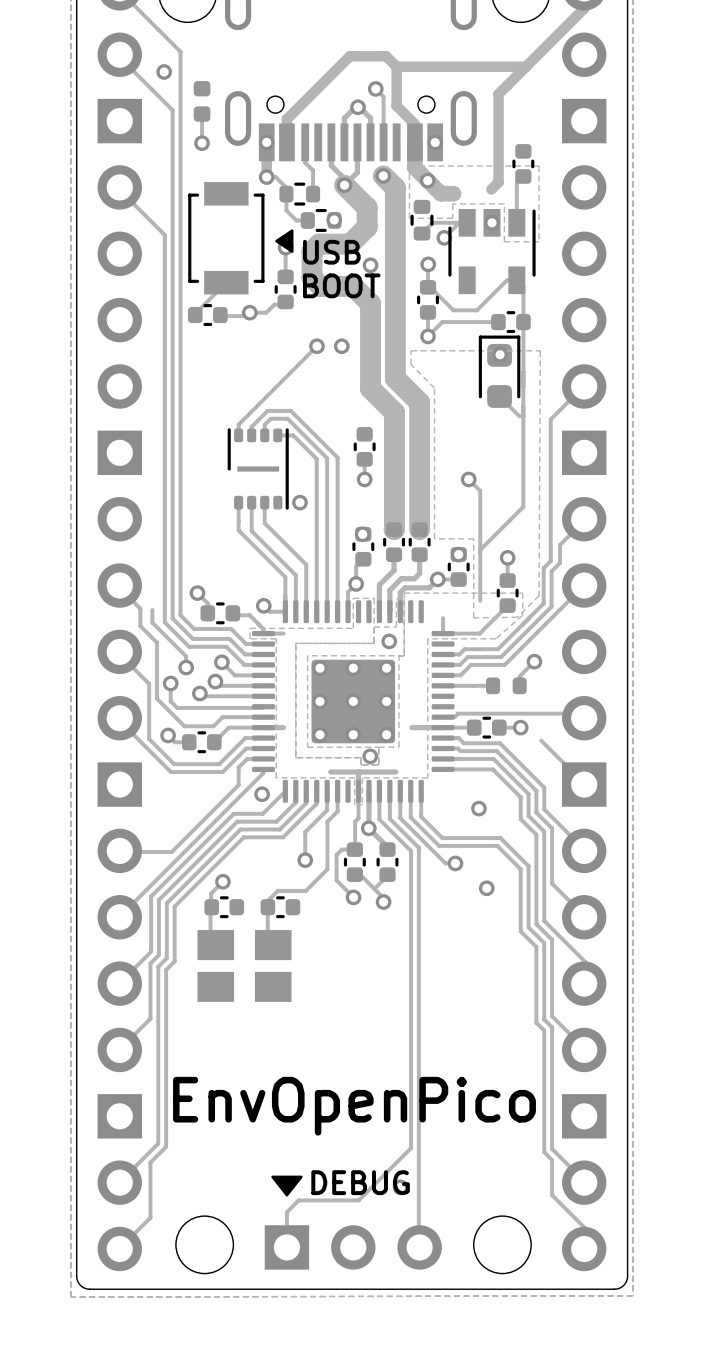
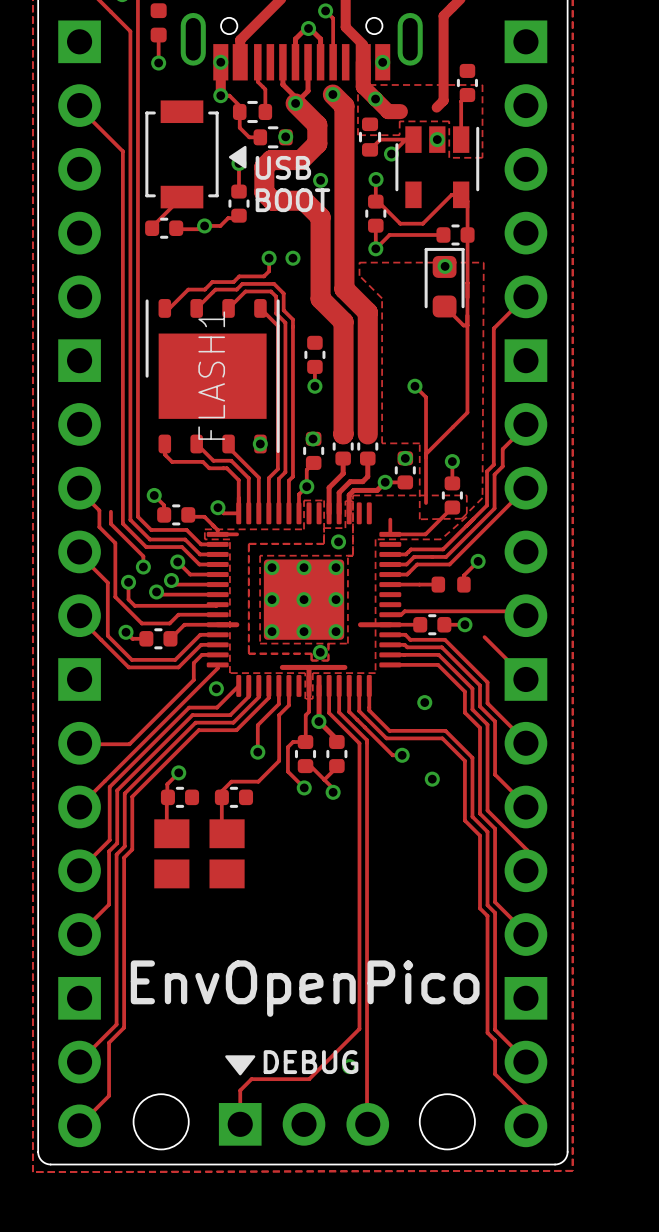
track: (316, 346) (238, 424) (238, 435) -> (269, 258) (269, 271) (263, 276) (239, 276) (233, 282) (212, 282) (204, 289) (188, 289) (169, 308) (164, 308)
track: (251, 435) (251, 426) (267, 410) (290, 410) (337, 457) (337, 577) -> (196, 308) (215, 289) (236, 289) (242, 283) (274, 283) (283, 293) (283, 310) (292, 319) (292, 476) (288, 480)
track: (264, 435) (264, 424) (270, 418) (287, 418) (327, 458) (327, 575) -> (228, 308) (245, 291) (270, 291) (276, 296) (276, 313) (285, 322) (285, 472) (278, 478)
track: (277, 435) (293, 435) (316, 458) (316, 575) -> (260, 308) (277, 325) (277, 469) (268, 478)
part: (258, 469) -> none
FLASH1: none -> (212, 376)
track: (238, 502) (238, 530) (273, 564) -> (164, 443) (164, 454) (172, 461) (202, 461) (209, 468) (226, 468)
track: (251, 502) (251, 531) (277, 556) -> (196, 443) (213, 460) (231, 460)
track: (264, 502) (264, 523) (306, 564) (306, 574) -> (228, 443) (228, 447) (258, 477)
via position: (300, 502) -> (260, 443)

